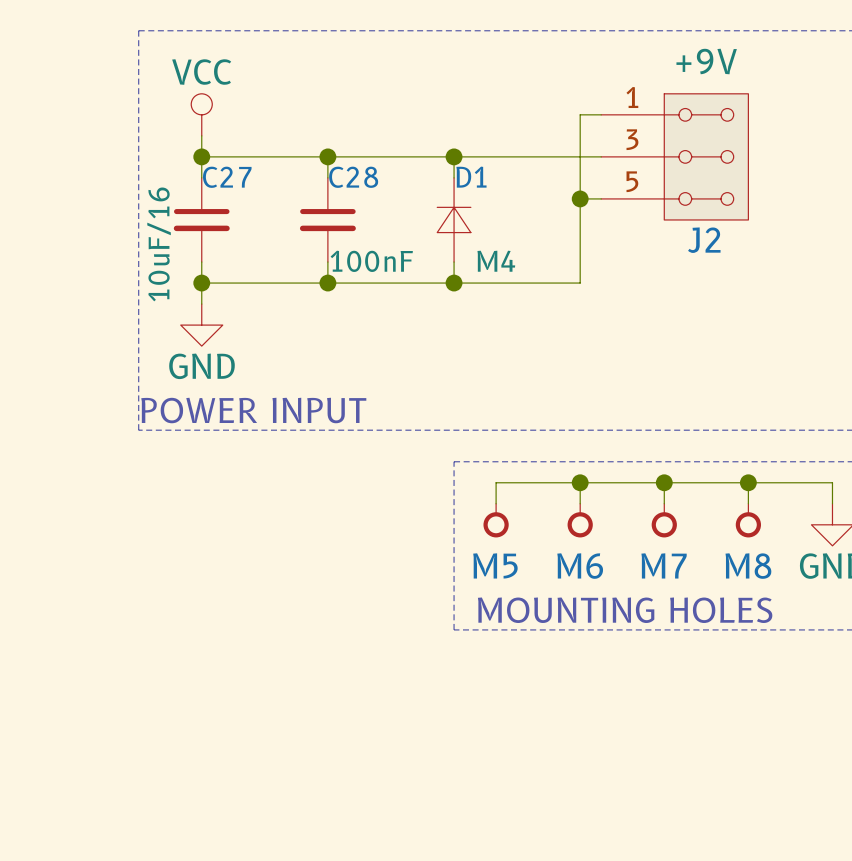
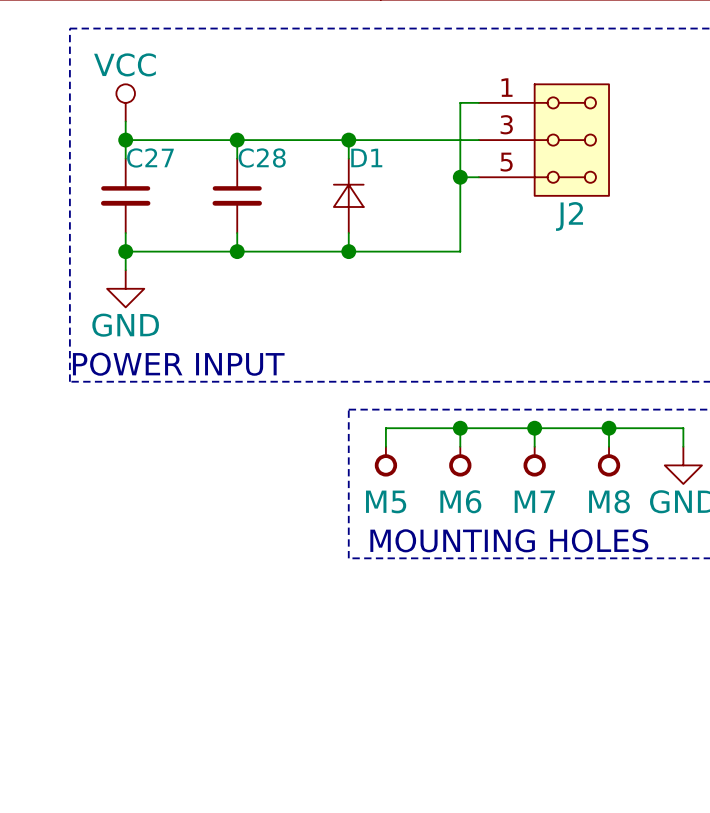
J2 value: +9V (706, 61) -> none
C27 value: 10uF/16 (159, 244) -> none
C28 value: 100nF (371, 261) -> none
D1 value: M4 (496, 261) -> none

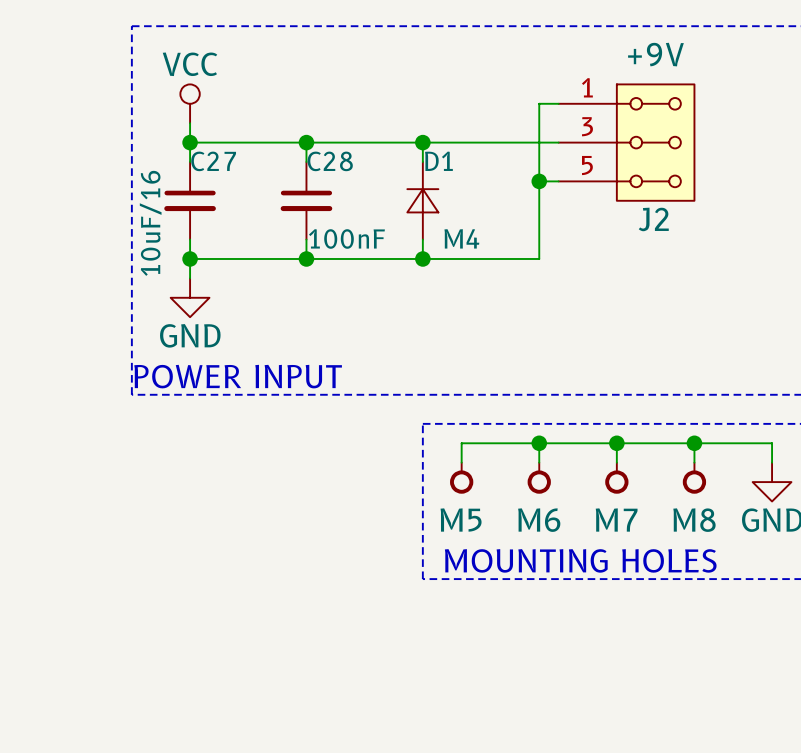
J2 value: none -> +9V (655, 54)
C27 value: none -> 10uF/16 (150, 223)
C28 value: none -> 100nF (346, 238)
D1 value: none -> M4 (461, 238)

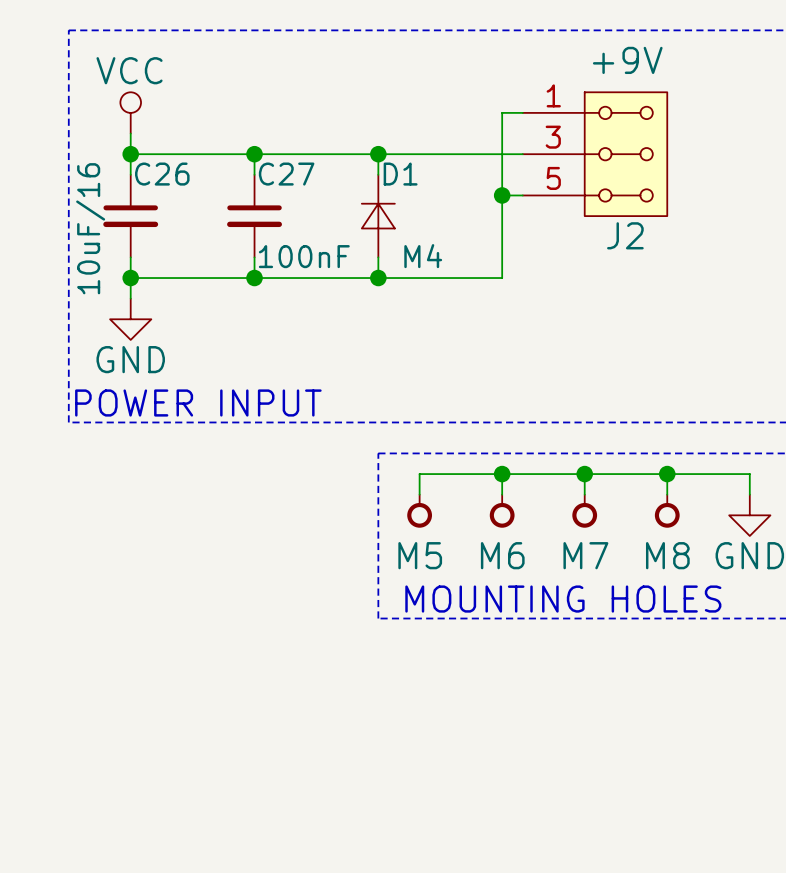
C27 name: C27 (213, 161) -> C26 (162, 174)
C28 name: C28 (330, 161) -> C27 (286, 174)

